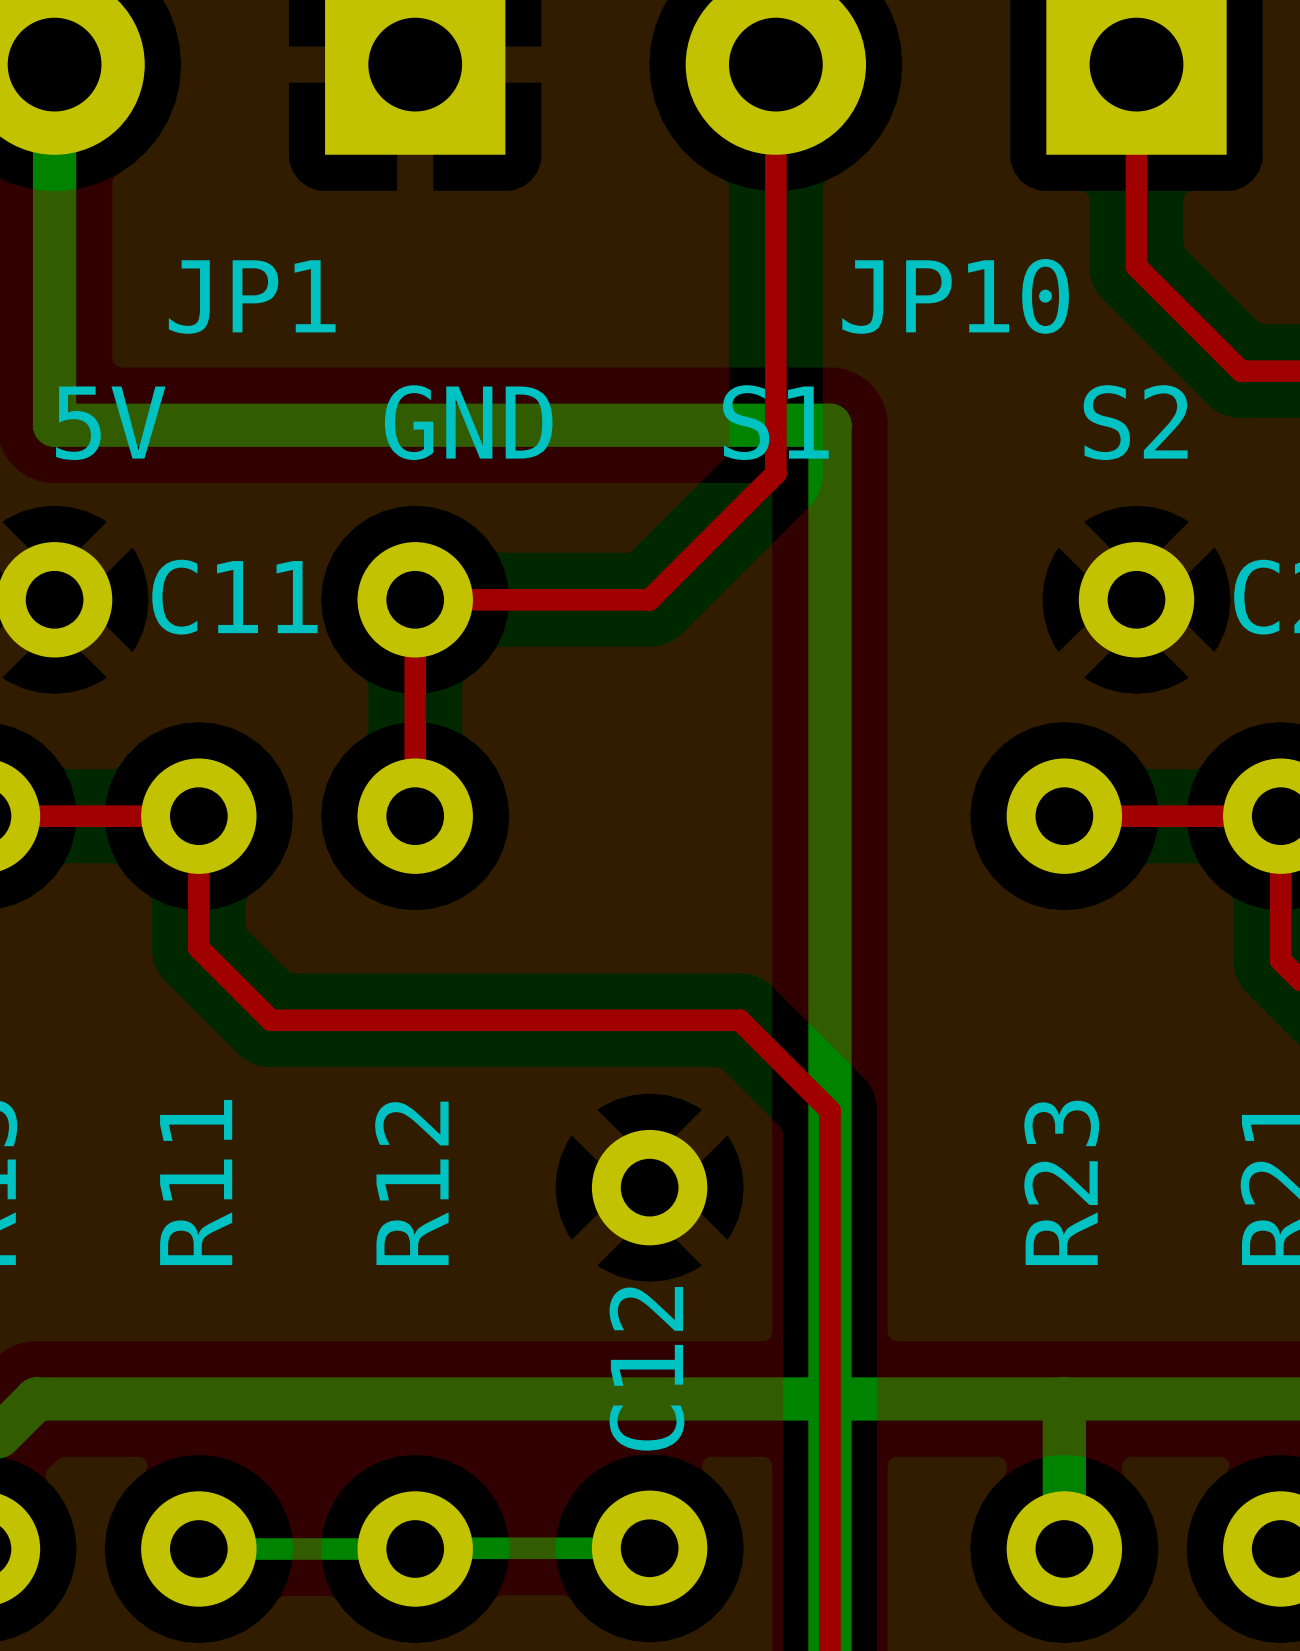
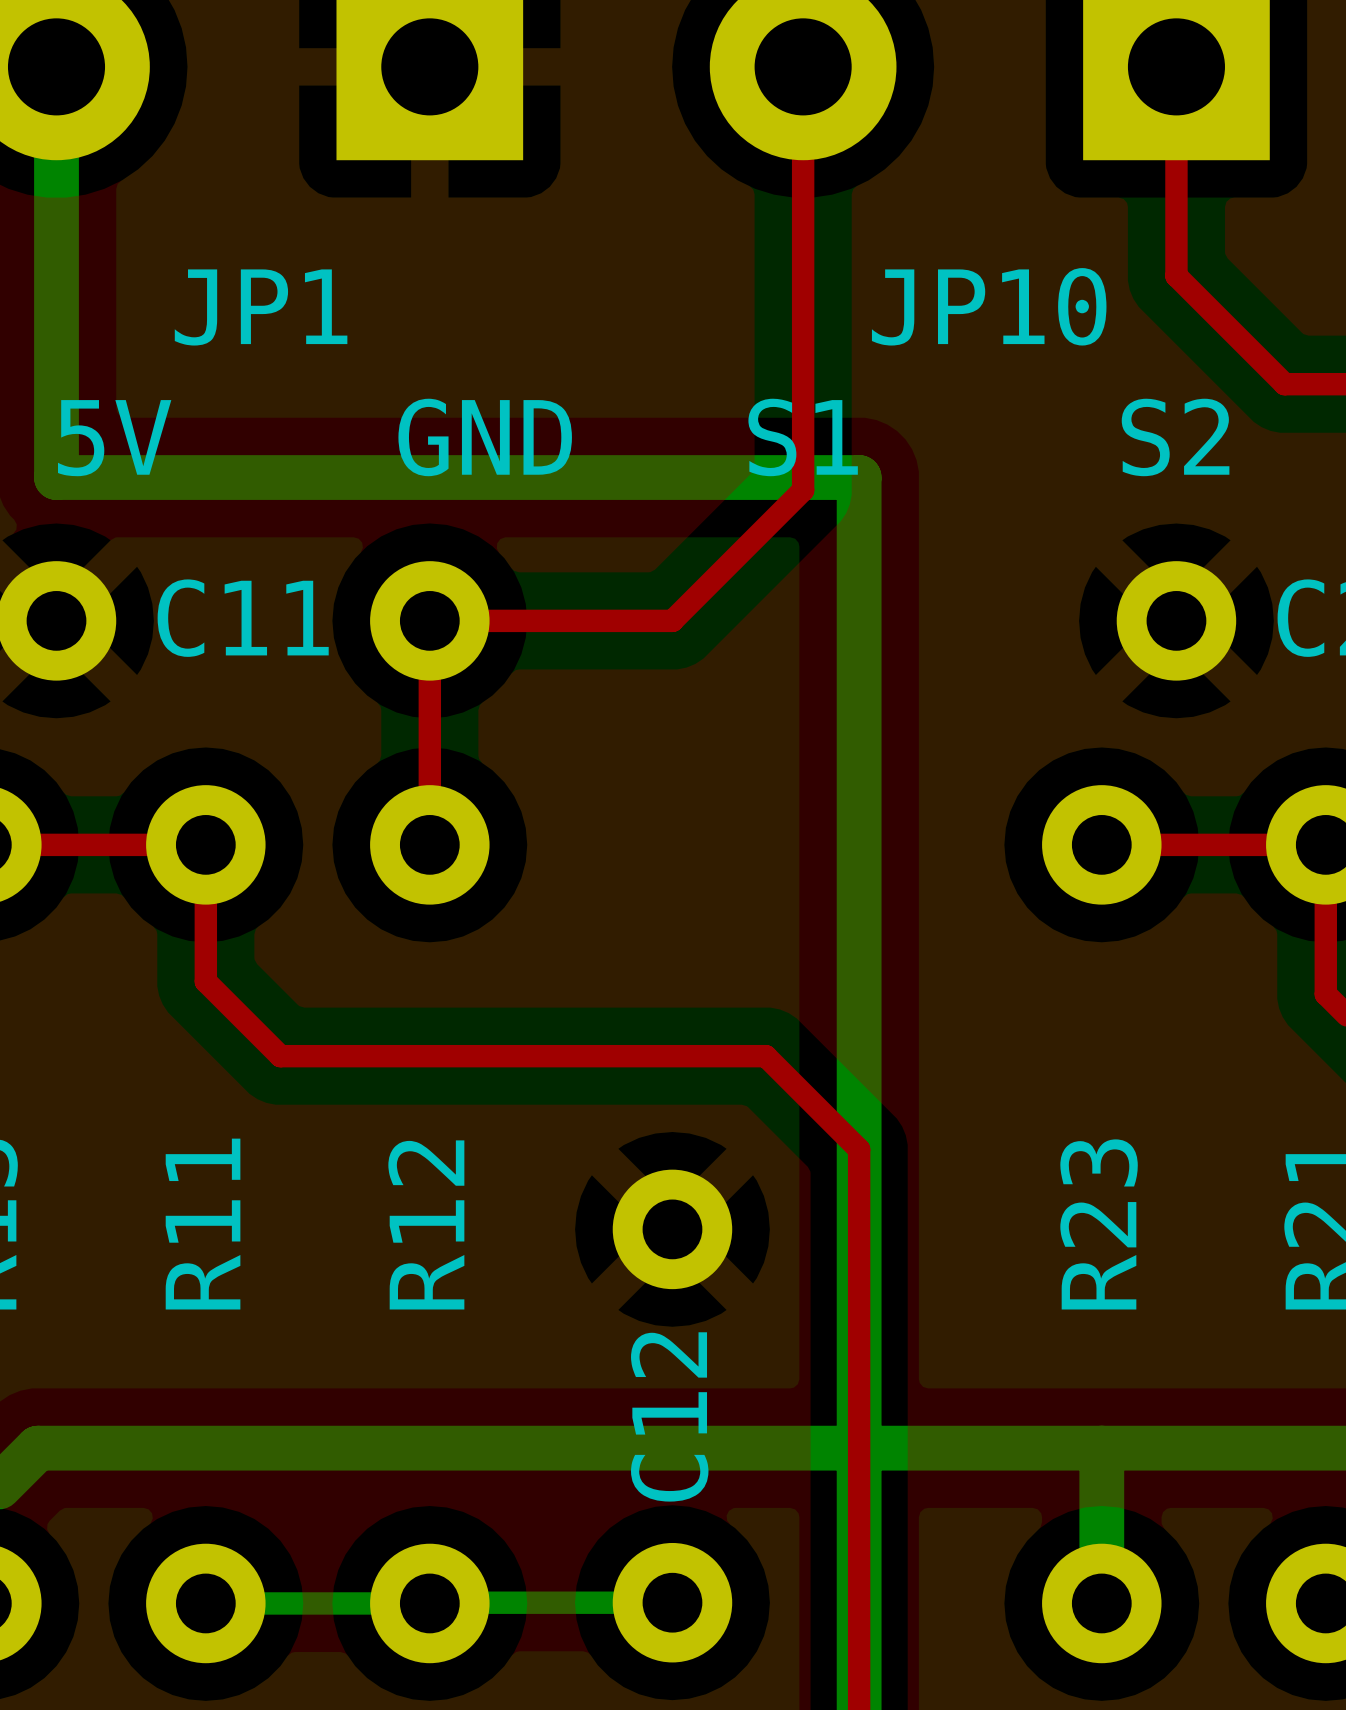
bottom track: (54, 425) (829, 425) (829, 461) -> (56, 440) (56, 477) (859, 477)

